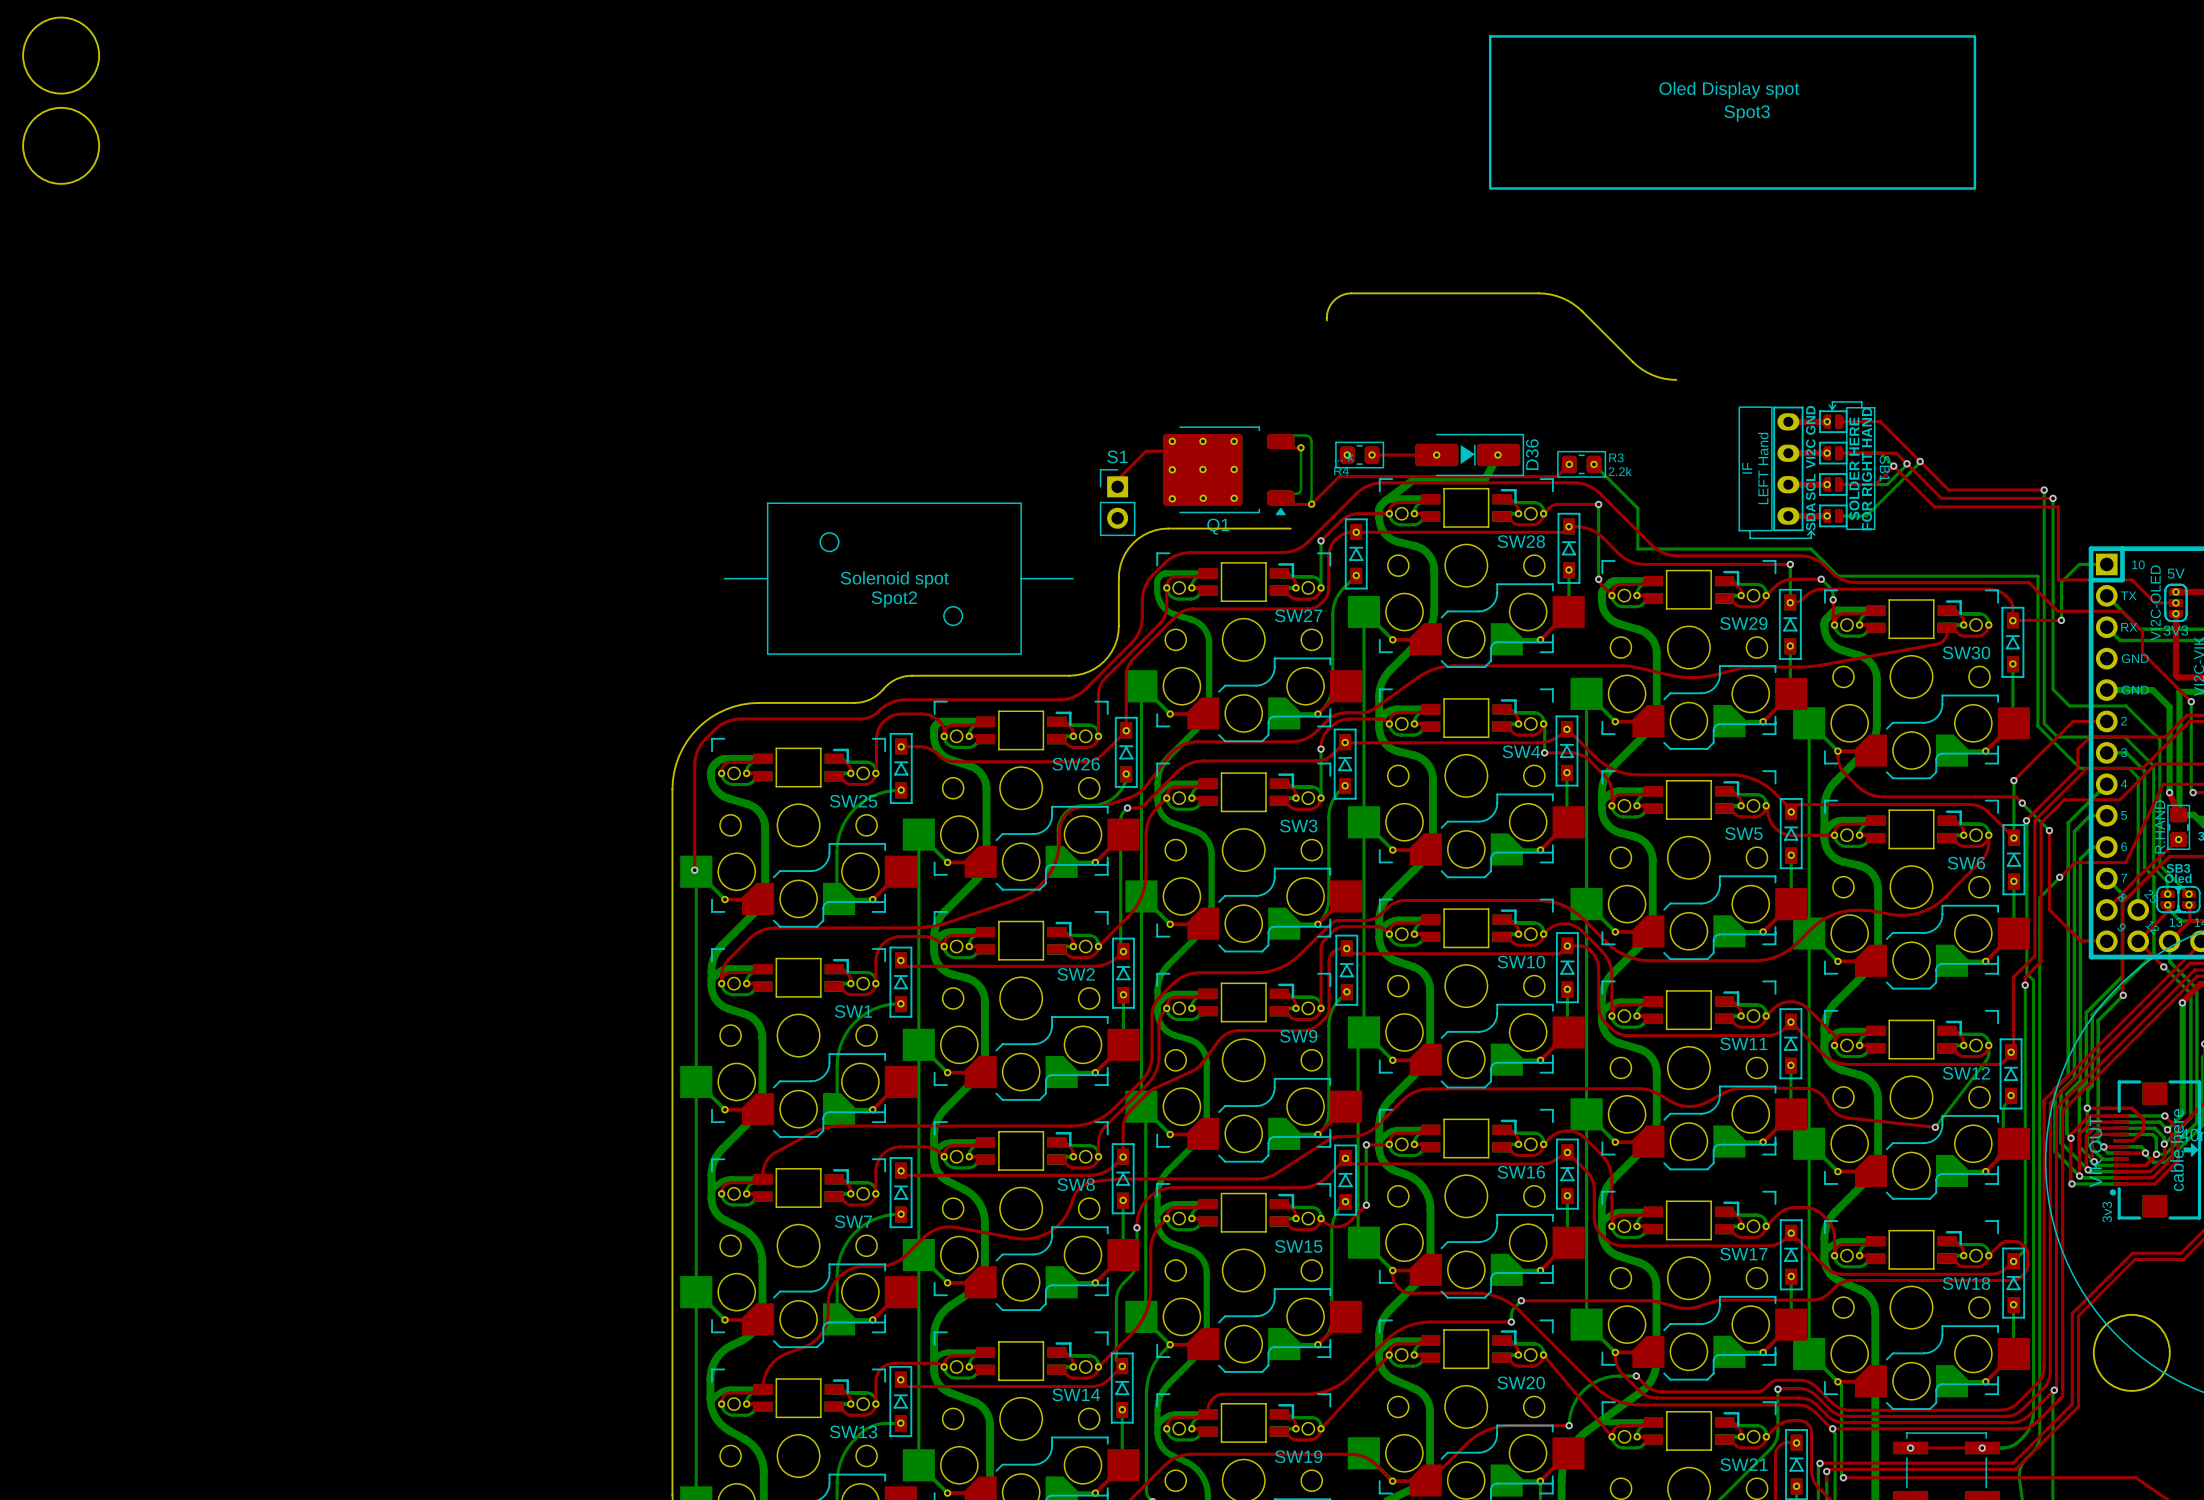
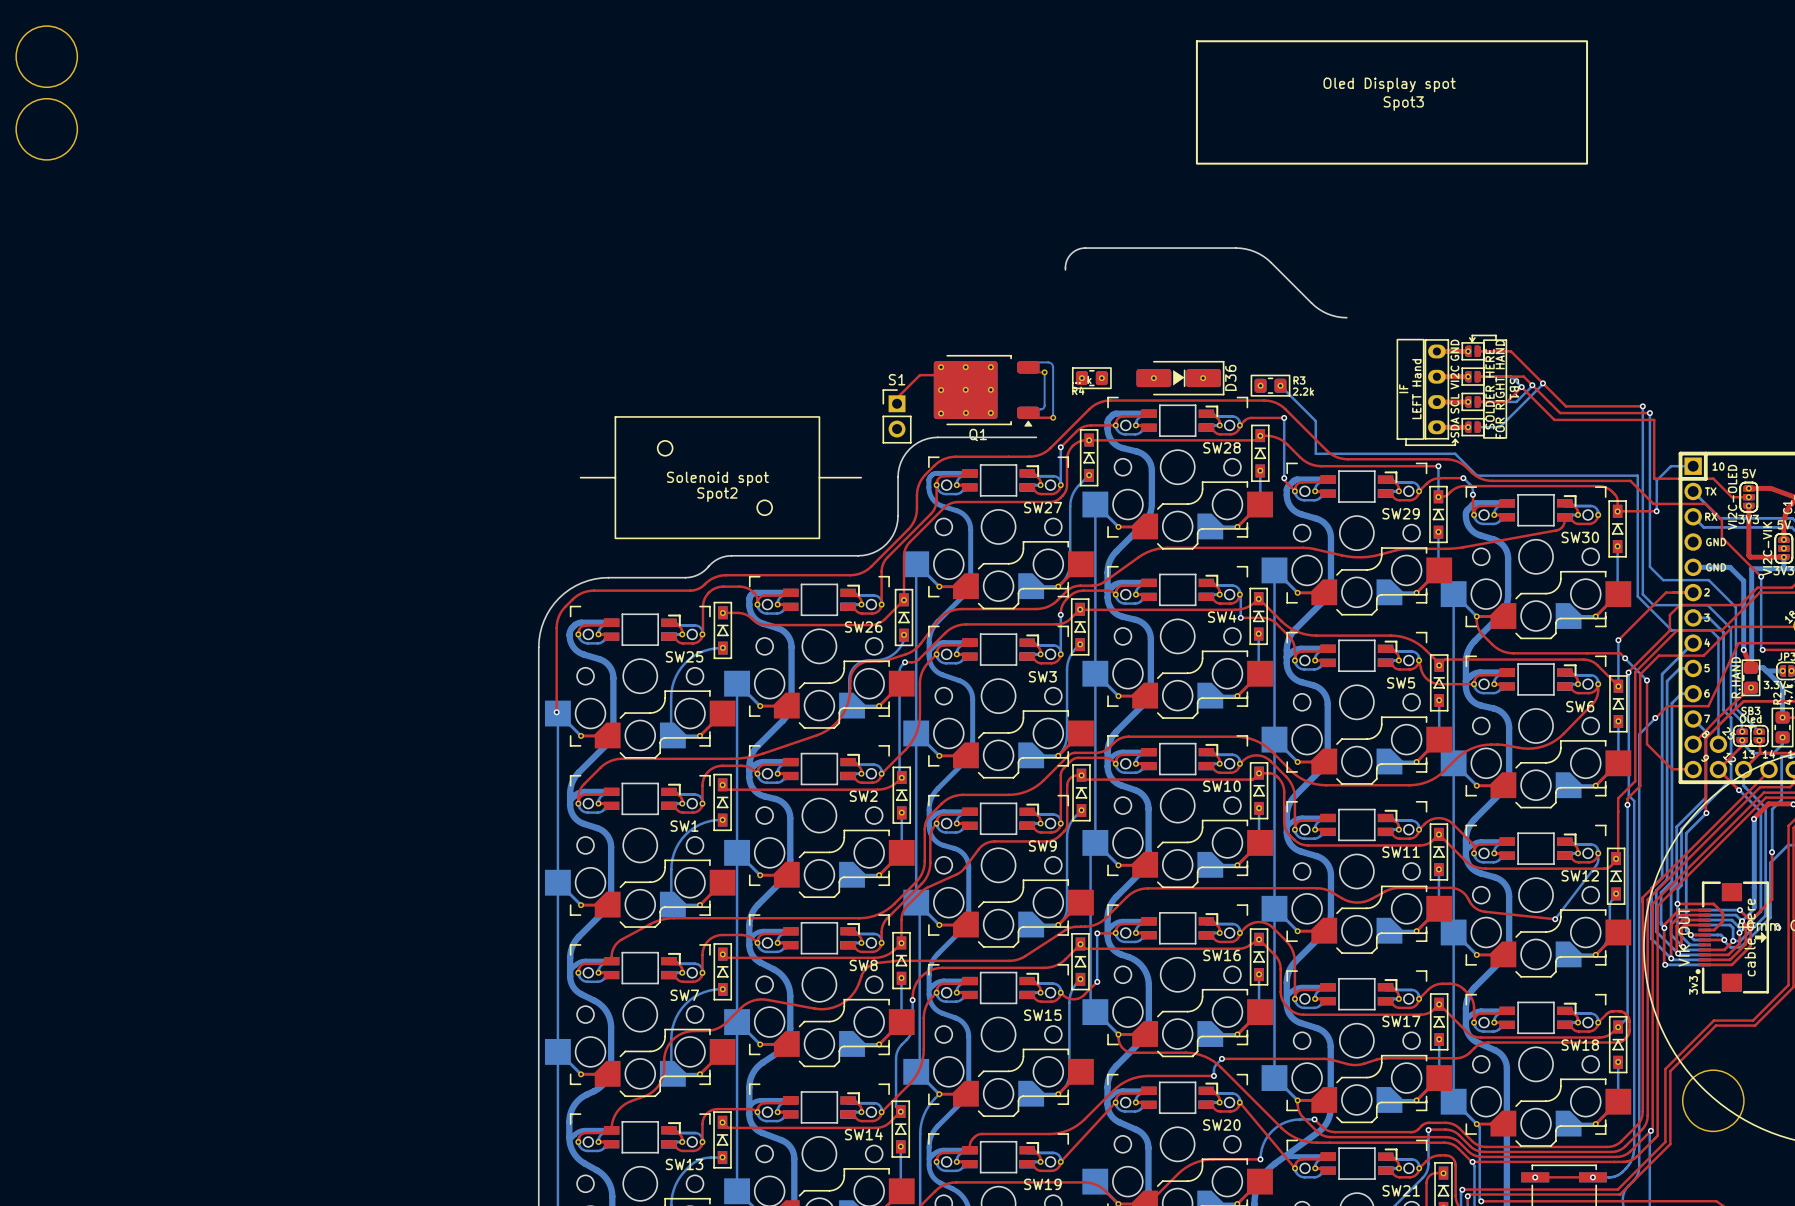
top track: (1372, 454) (1436, 454) -> none
bottom track: (1498, 454) (1484, 480) (1412, 480) (1385, 501) -> none
top track: (1569, 464) (1557, 476) (1339, 476) (1311, 504) -> none

